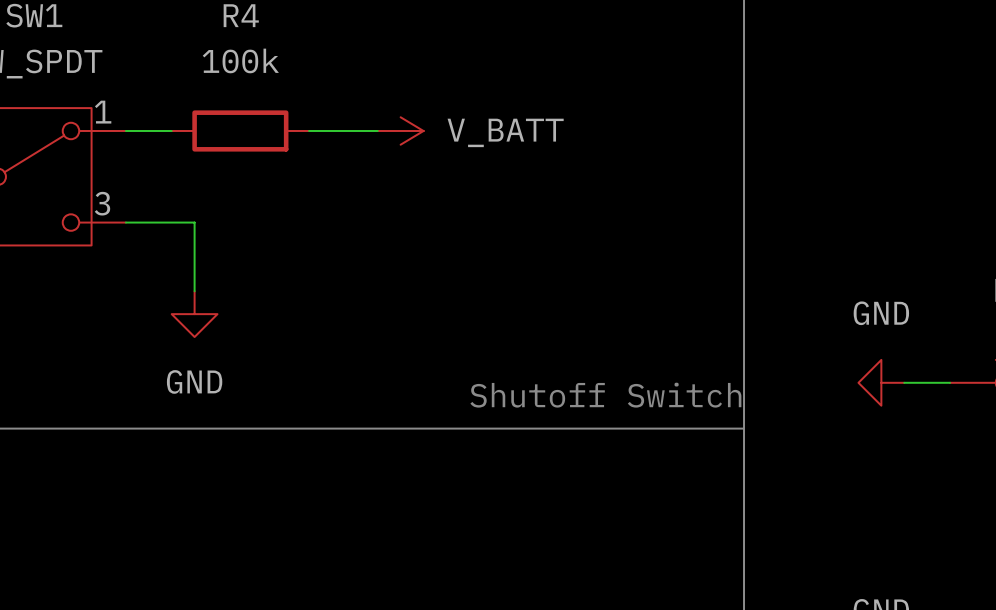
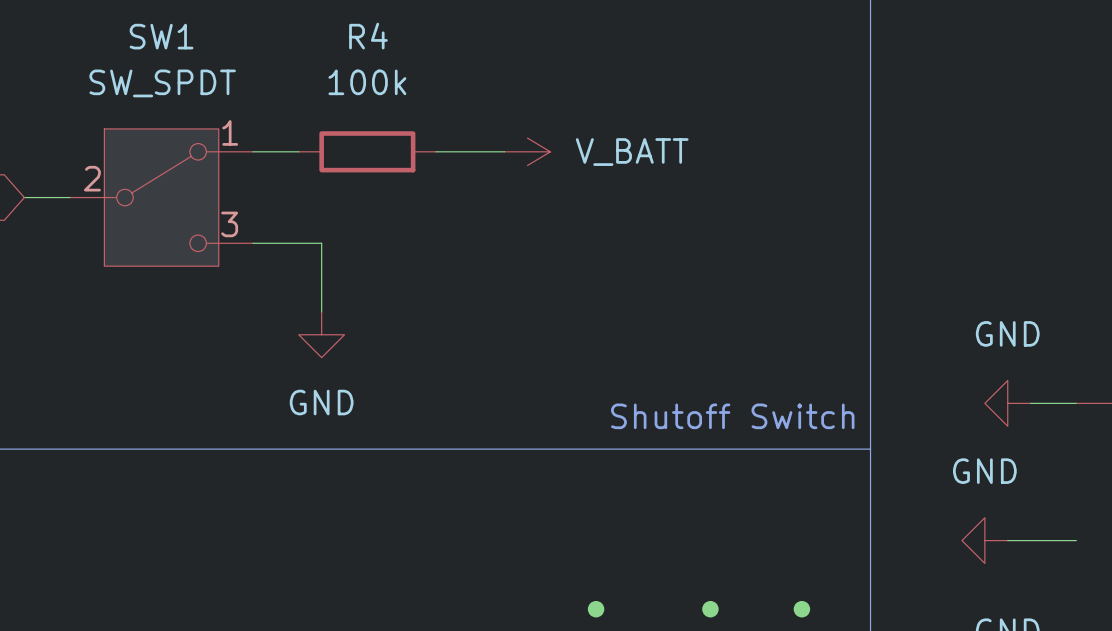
power symbol: none -> GND (984, 540)
wire: none -> (1007, 540) (1076, 540)
junction: none -> (596, 609)
junction: none -> (710, 609)
junction: none -> (801, 609)

